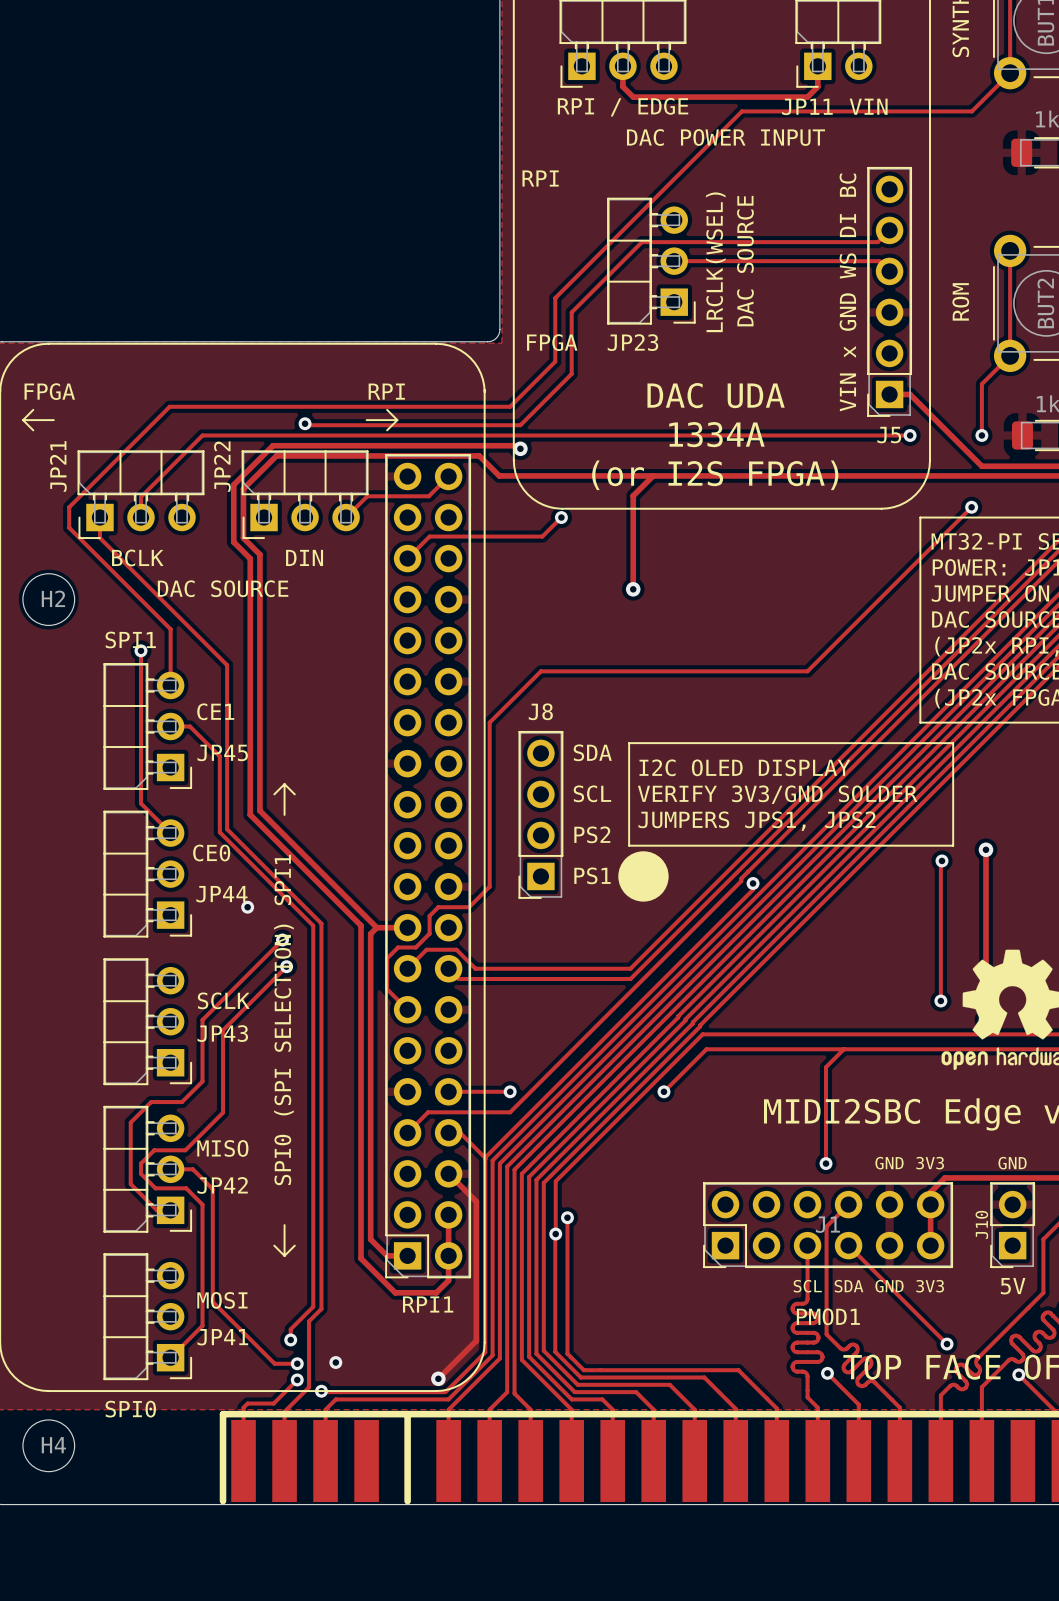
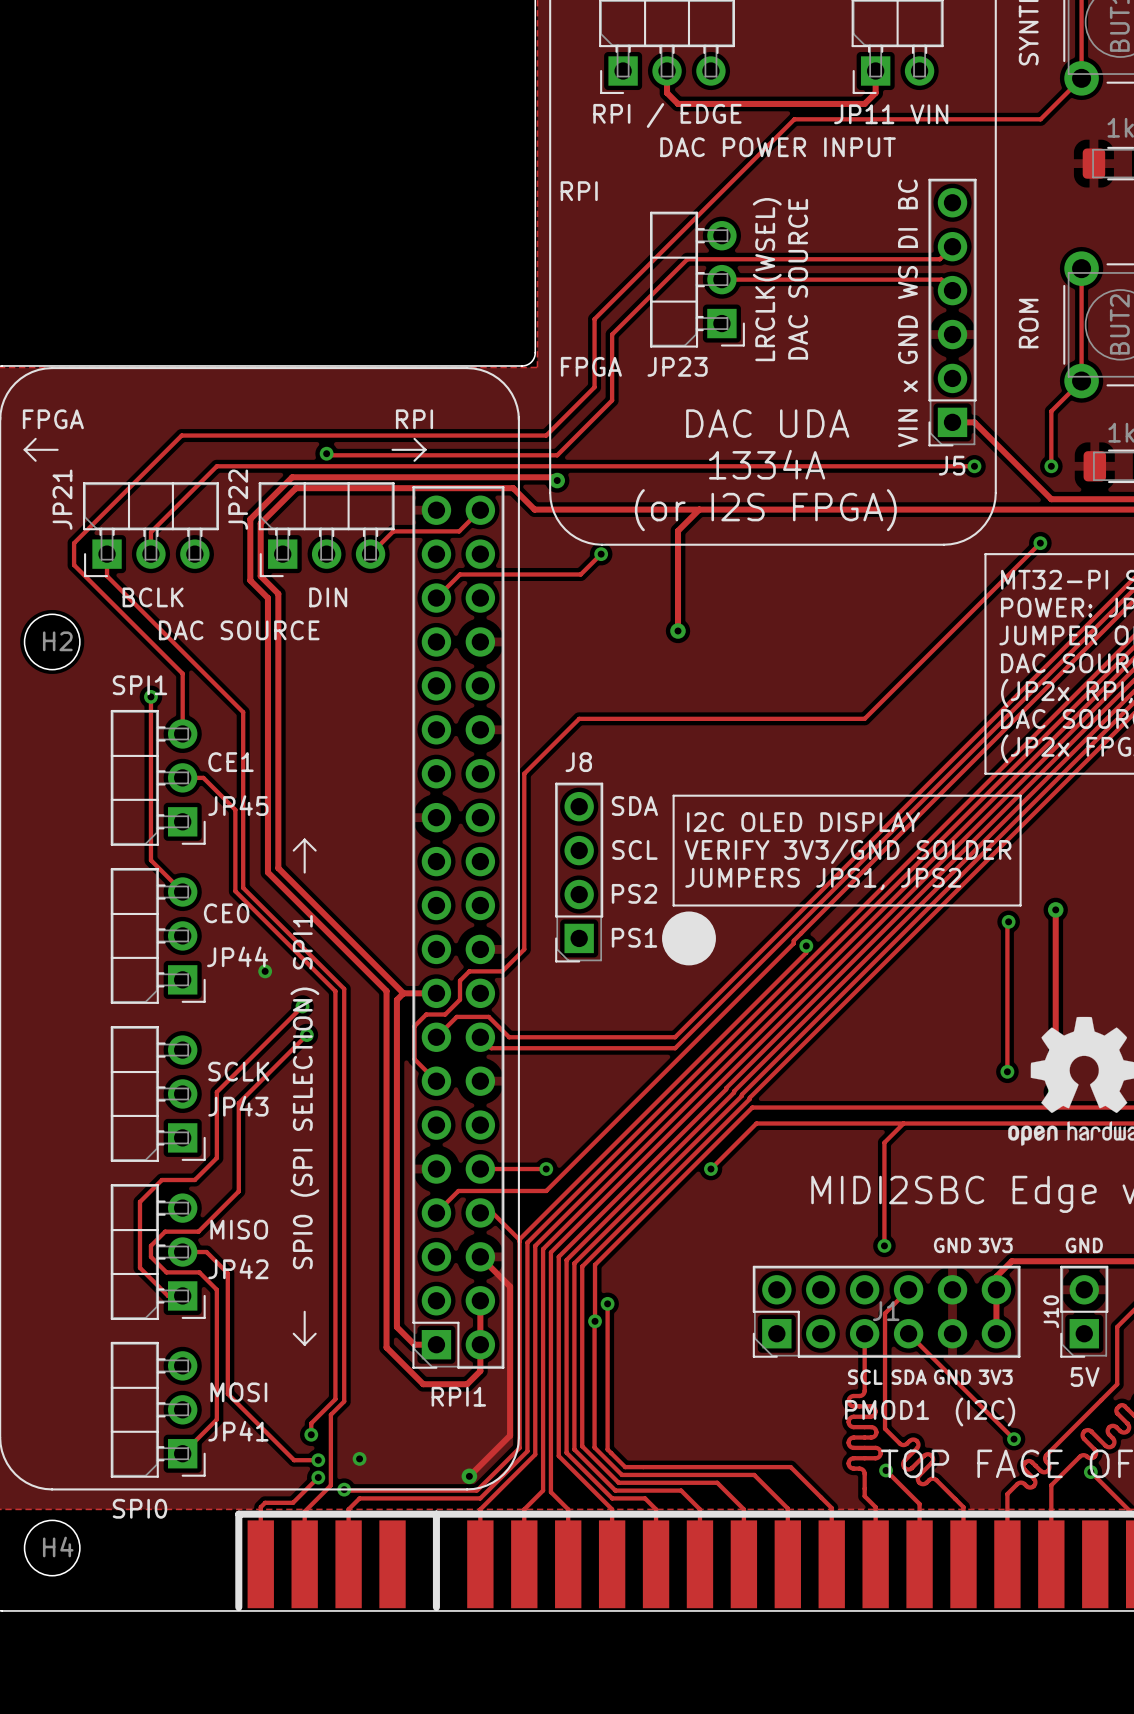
text: none -> (I2C) (985, 1412)

